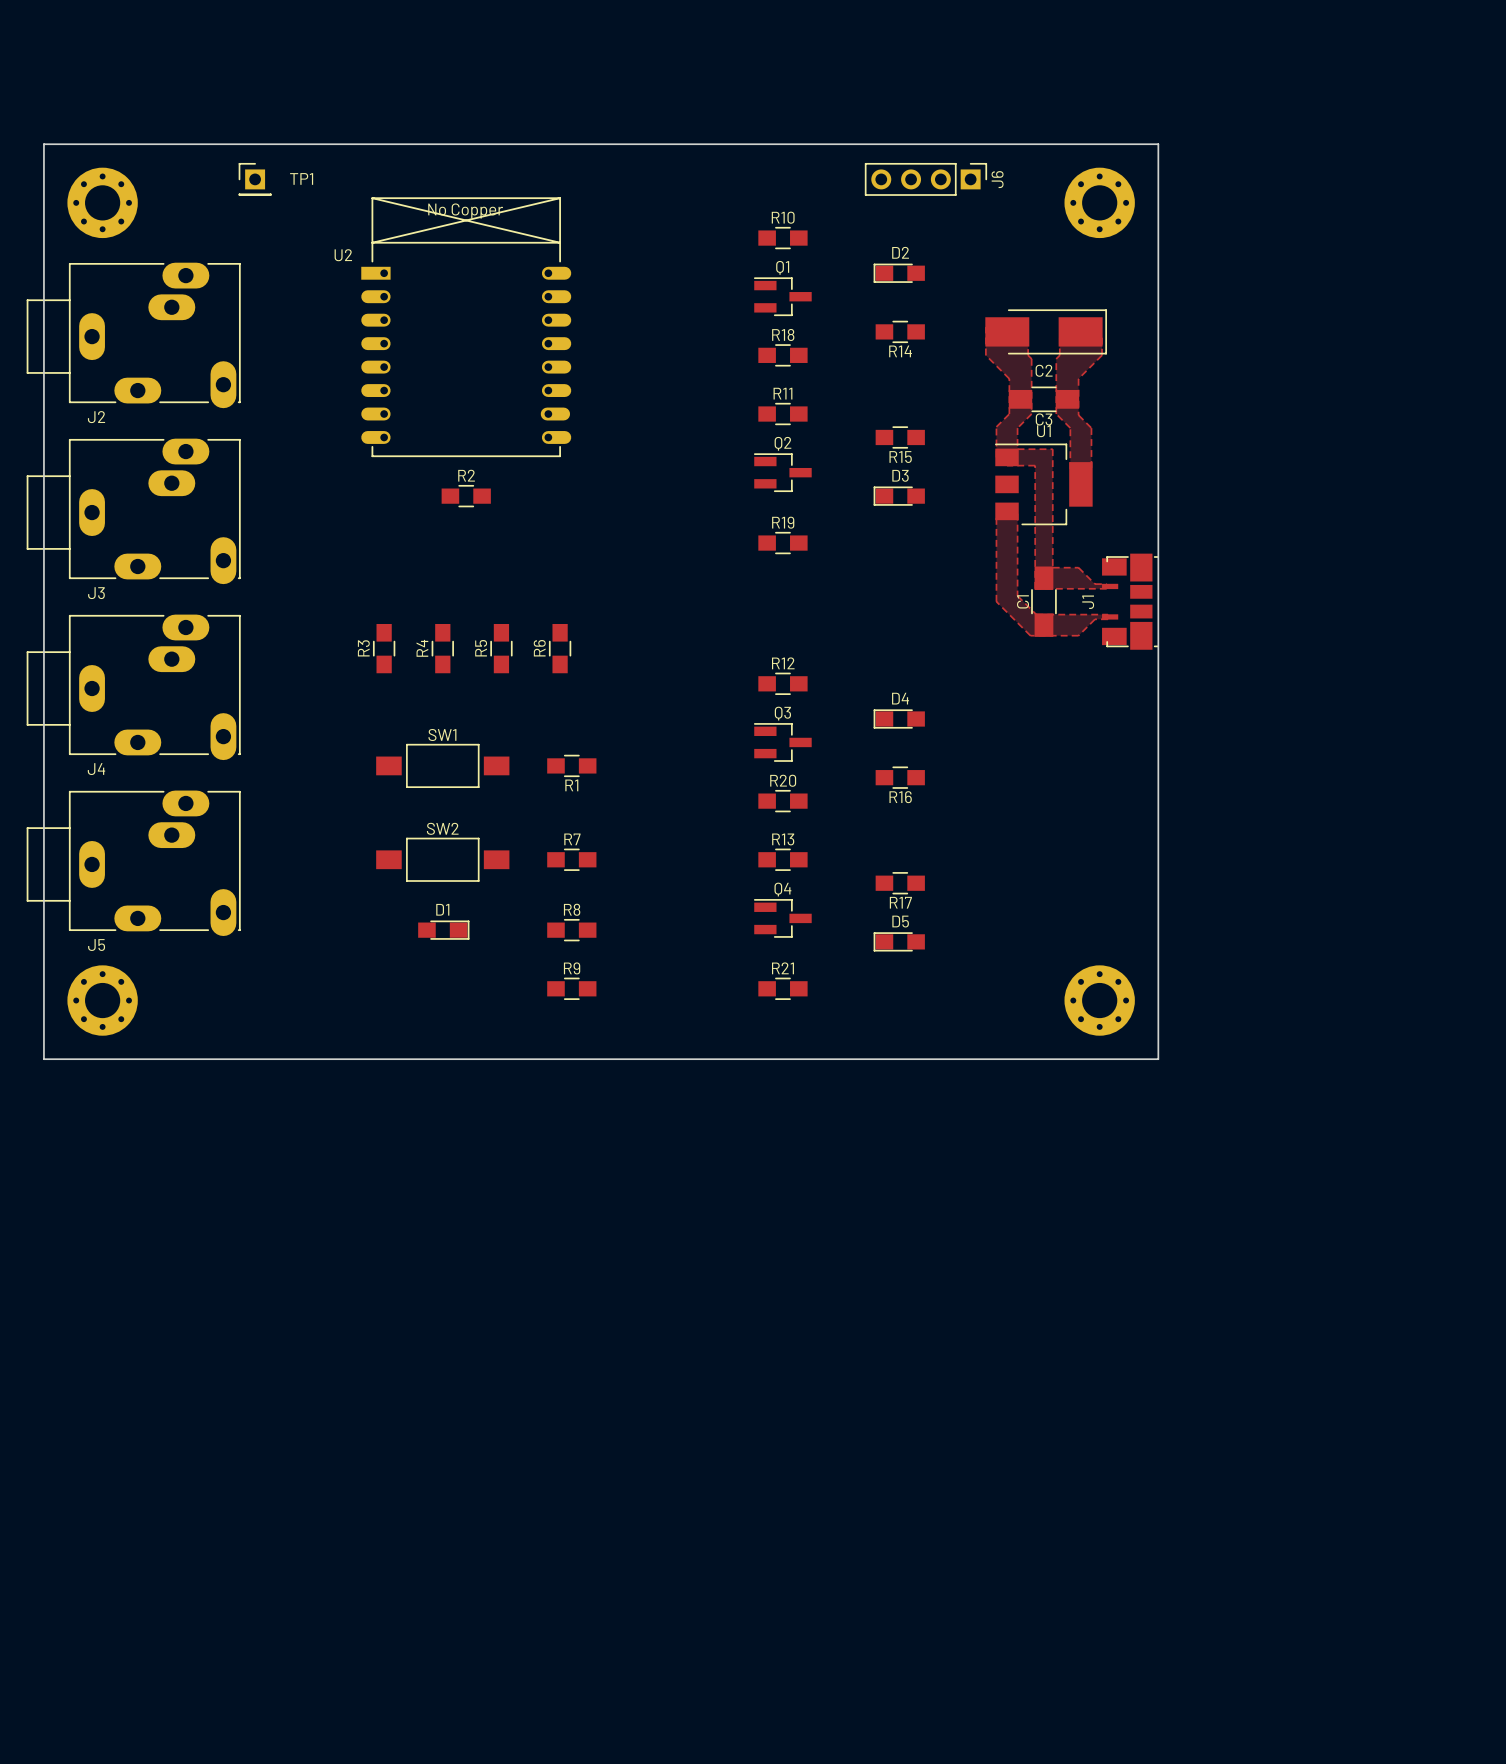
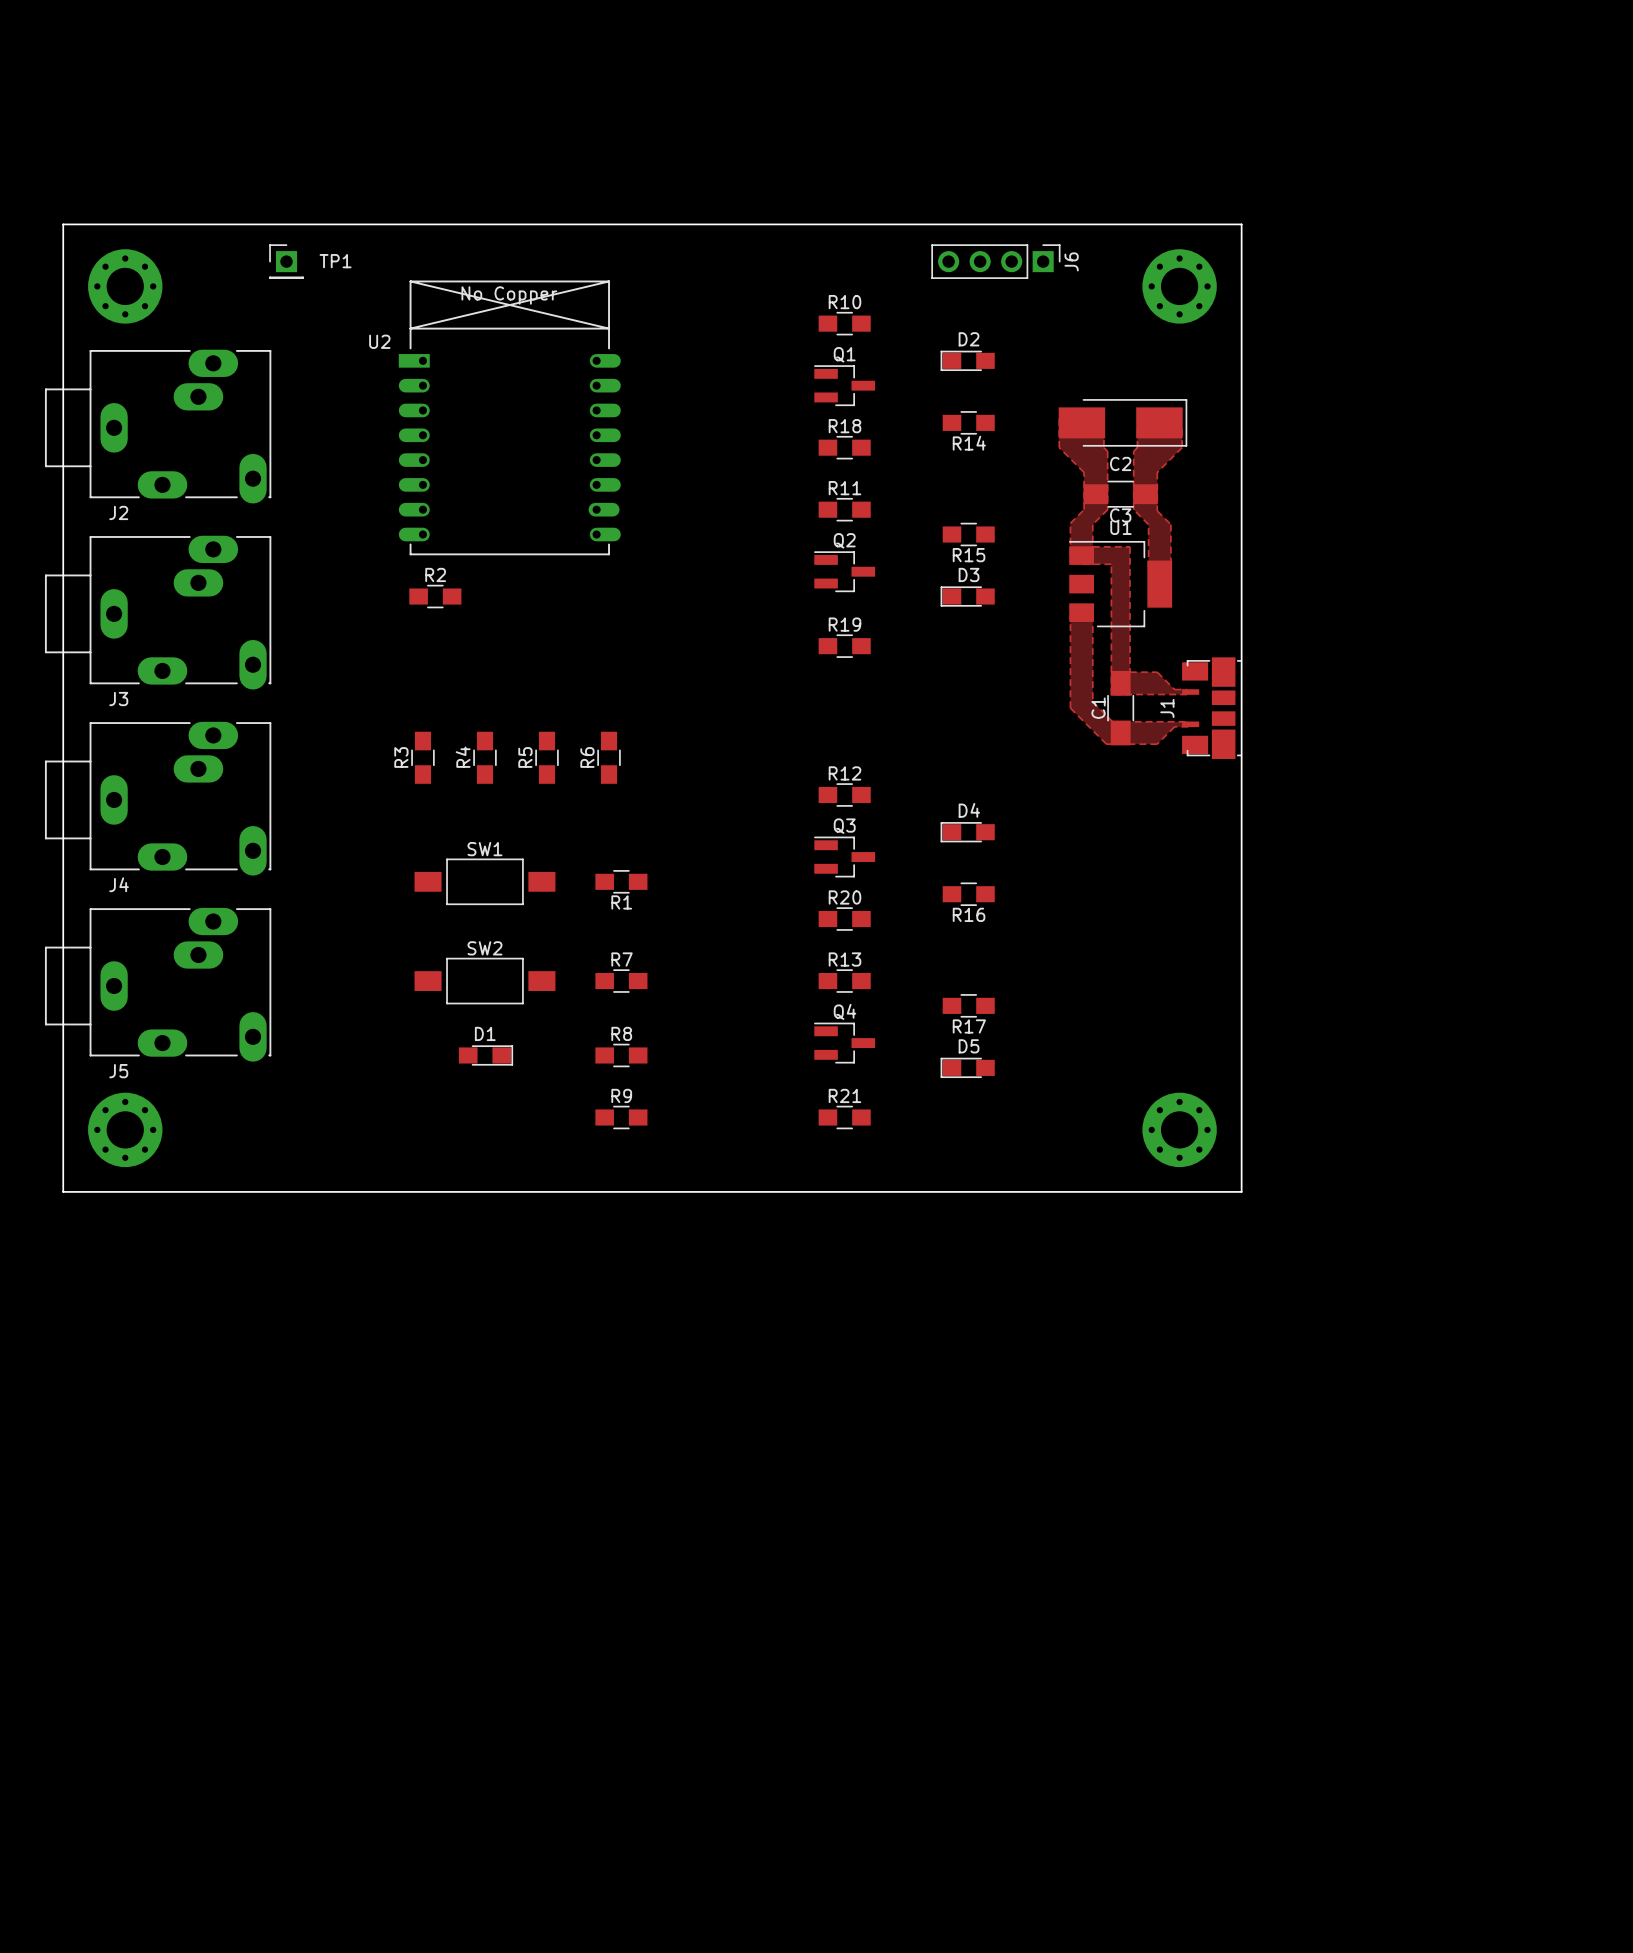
R2 position: (466, 496) -> (435, 596)

